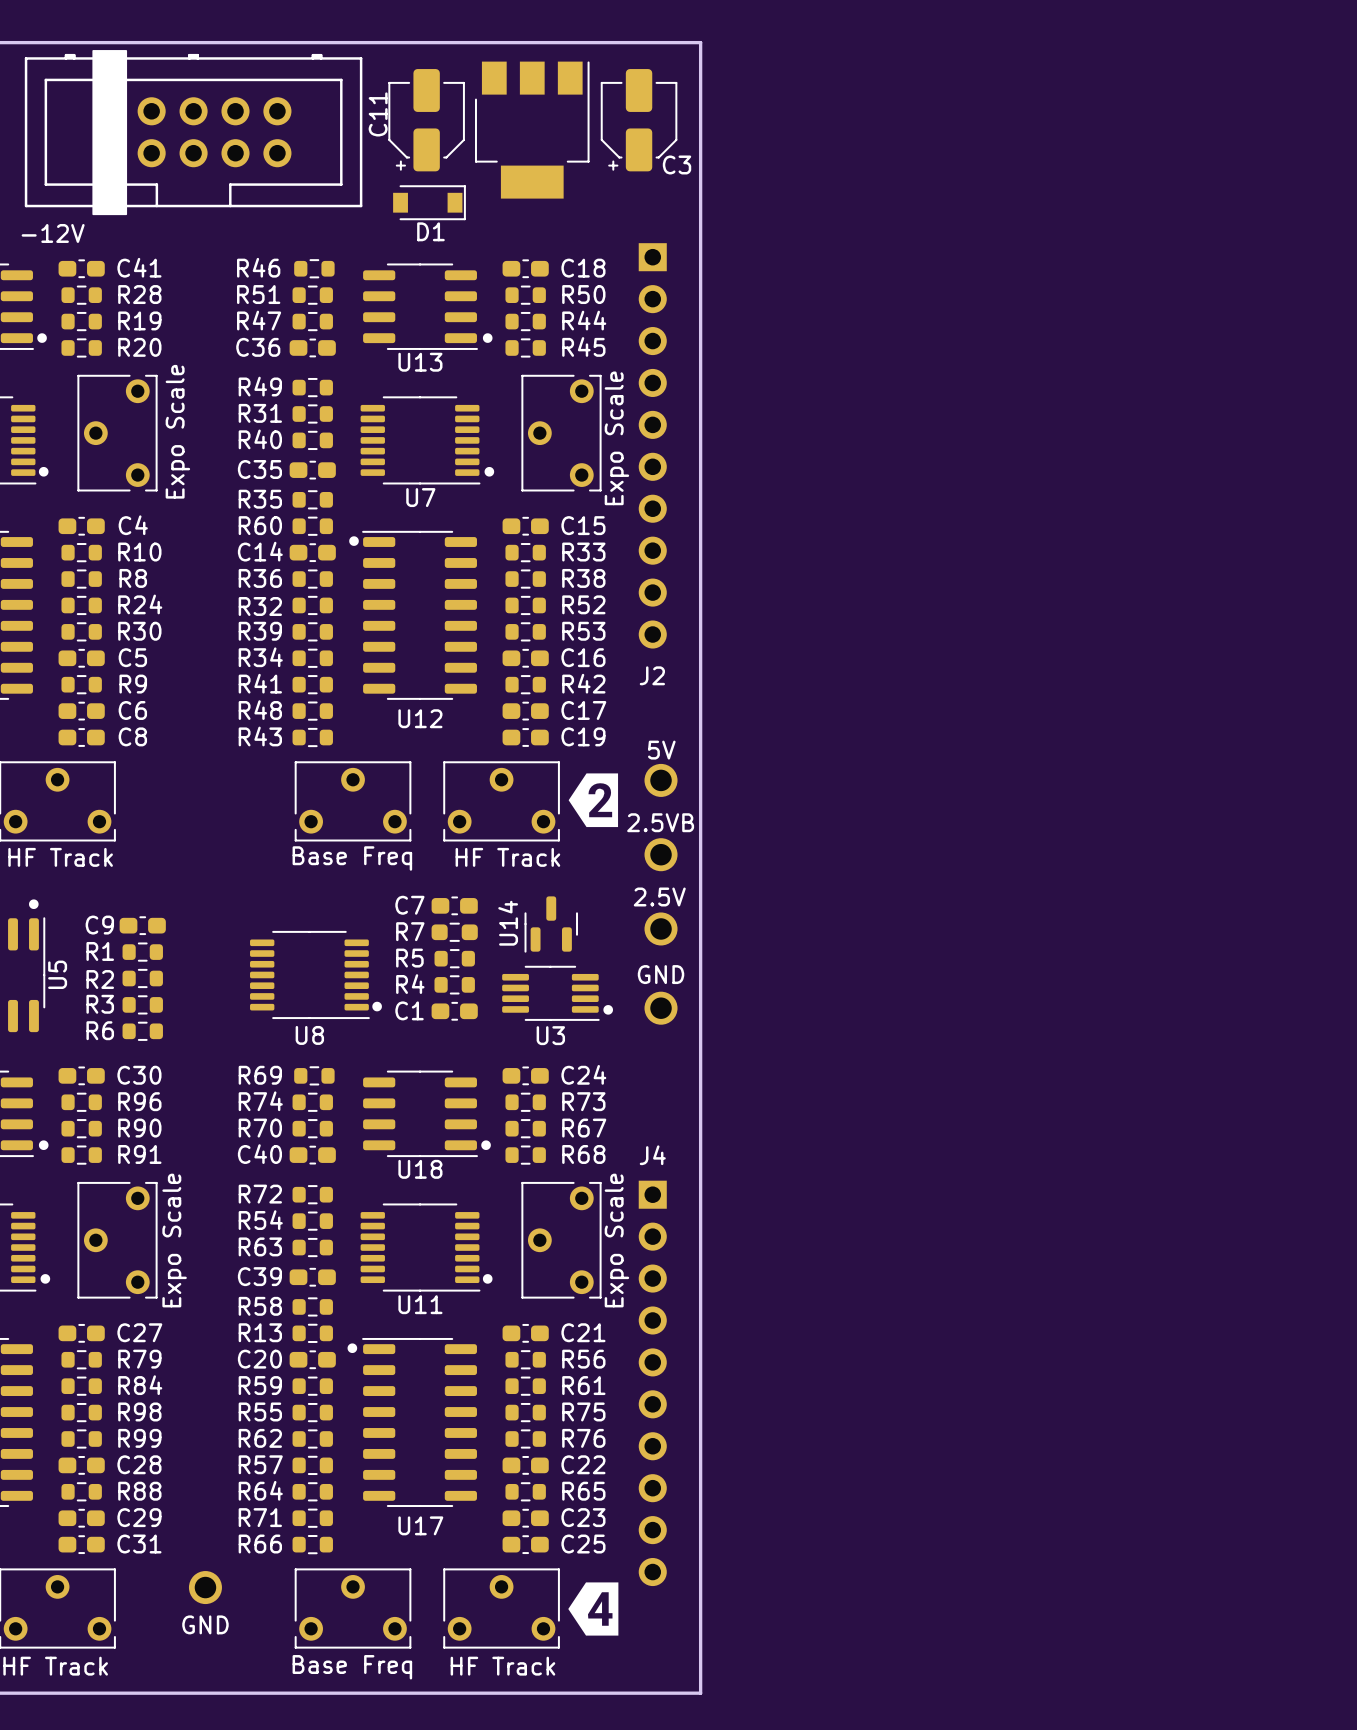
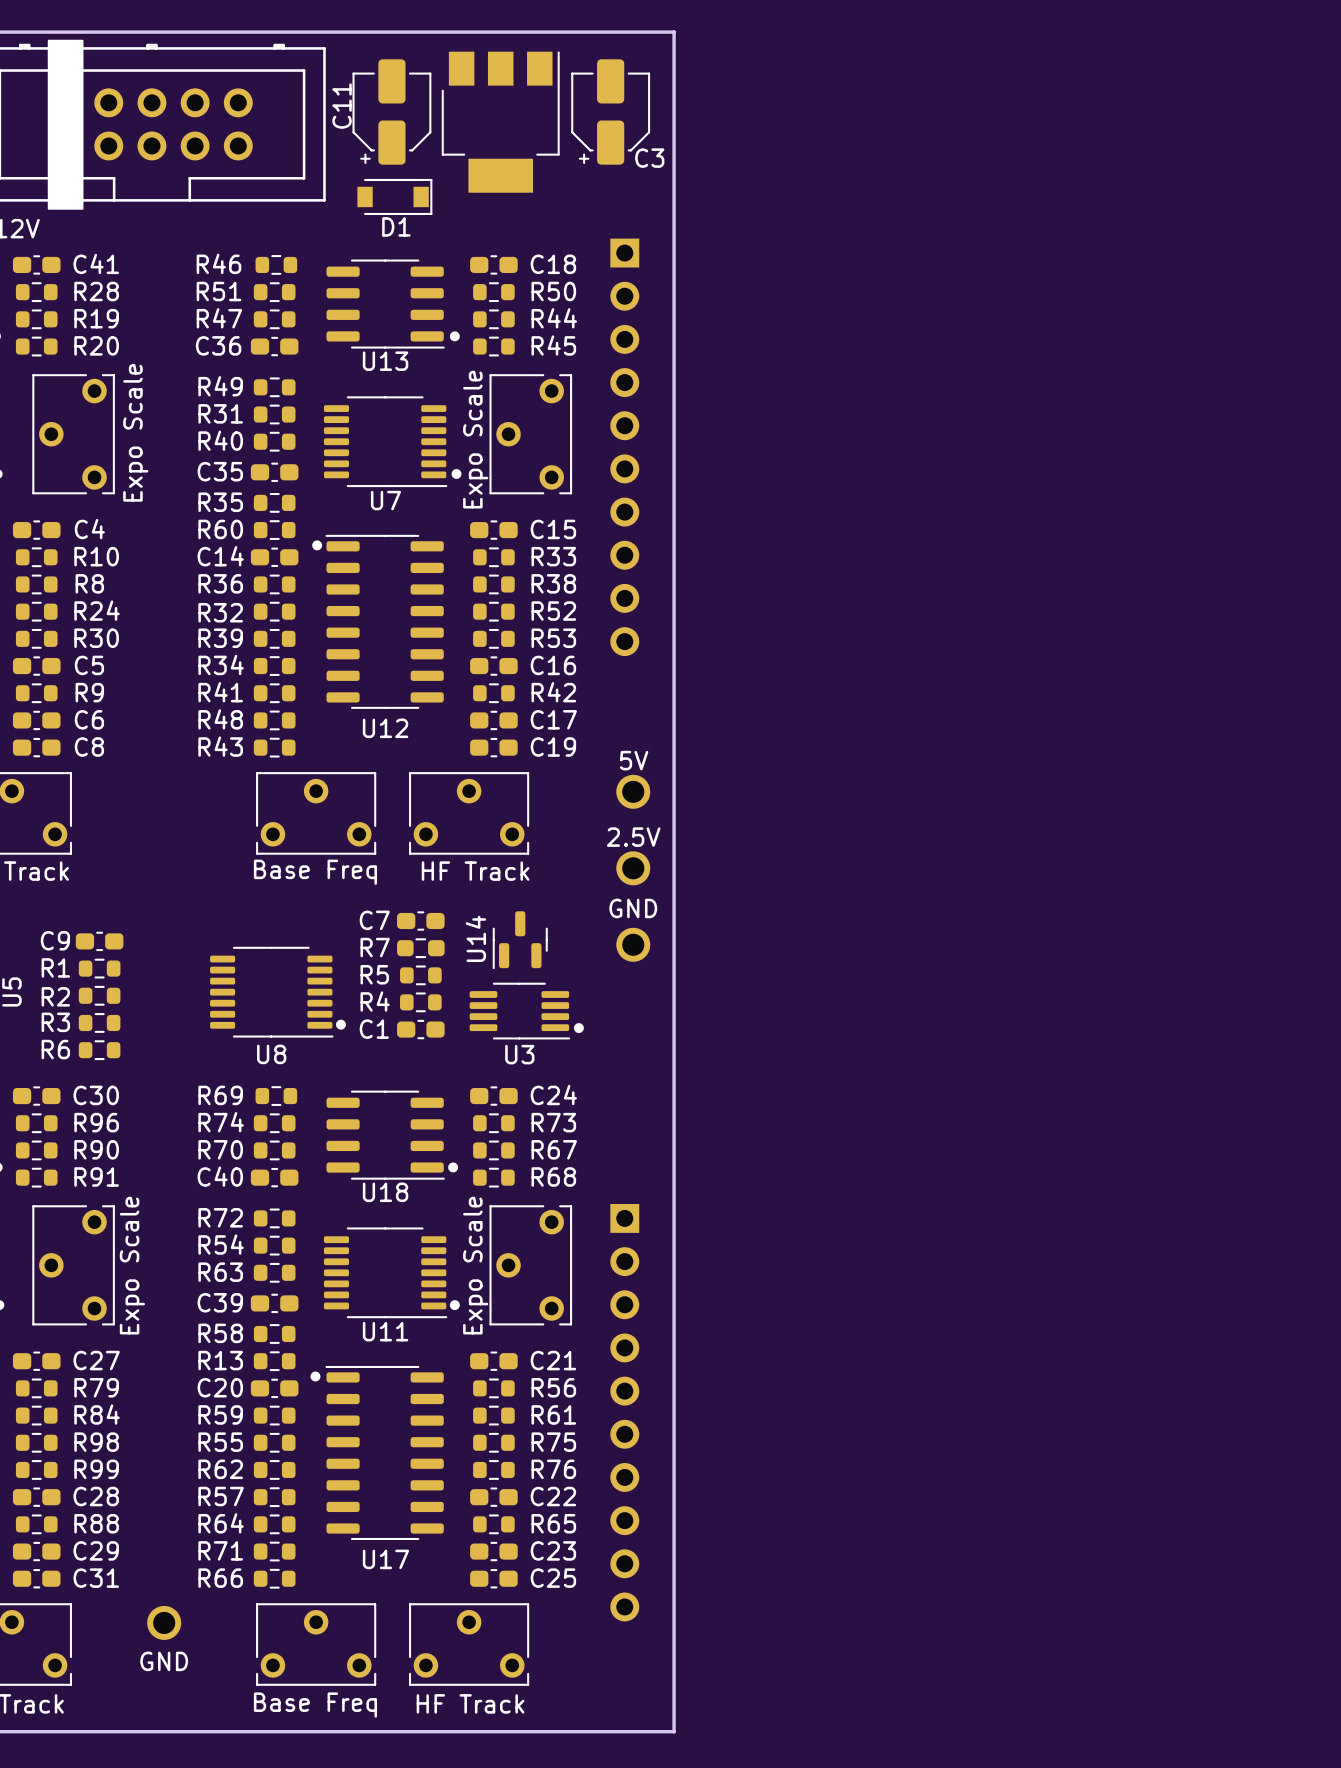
text position: Expo Scale (616, 438) -> Expo Scale (475, 439)
J2 name: J2 (652, 675) -> none
drawing: [568, 773, 619, 828] -> none
text: 2.5VB (660, 822) -> 2.5V (633, 837)
text: 2.5V (659, 896) -> GND (633, 908)
text: GND (661, 974) -> none
part: (661, 1008) -> none
J4 name: J4 (652, 1155) -> none
text position: Expo Scale (616, 1240) -> Expo Scale (475, 1265)
drawing: [568, 1582, 619, 1636] -> none

